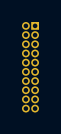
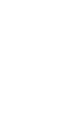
part: (30, 67) -> none

